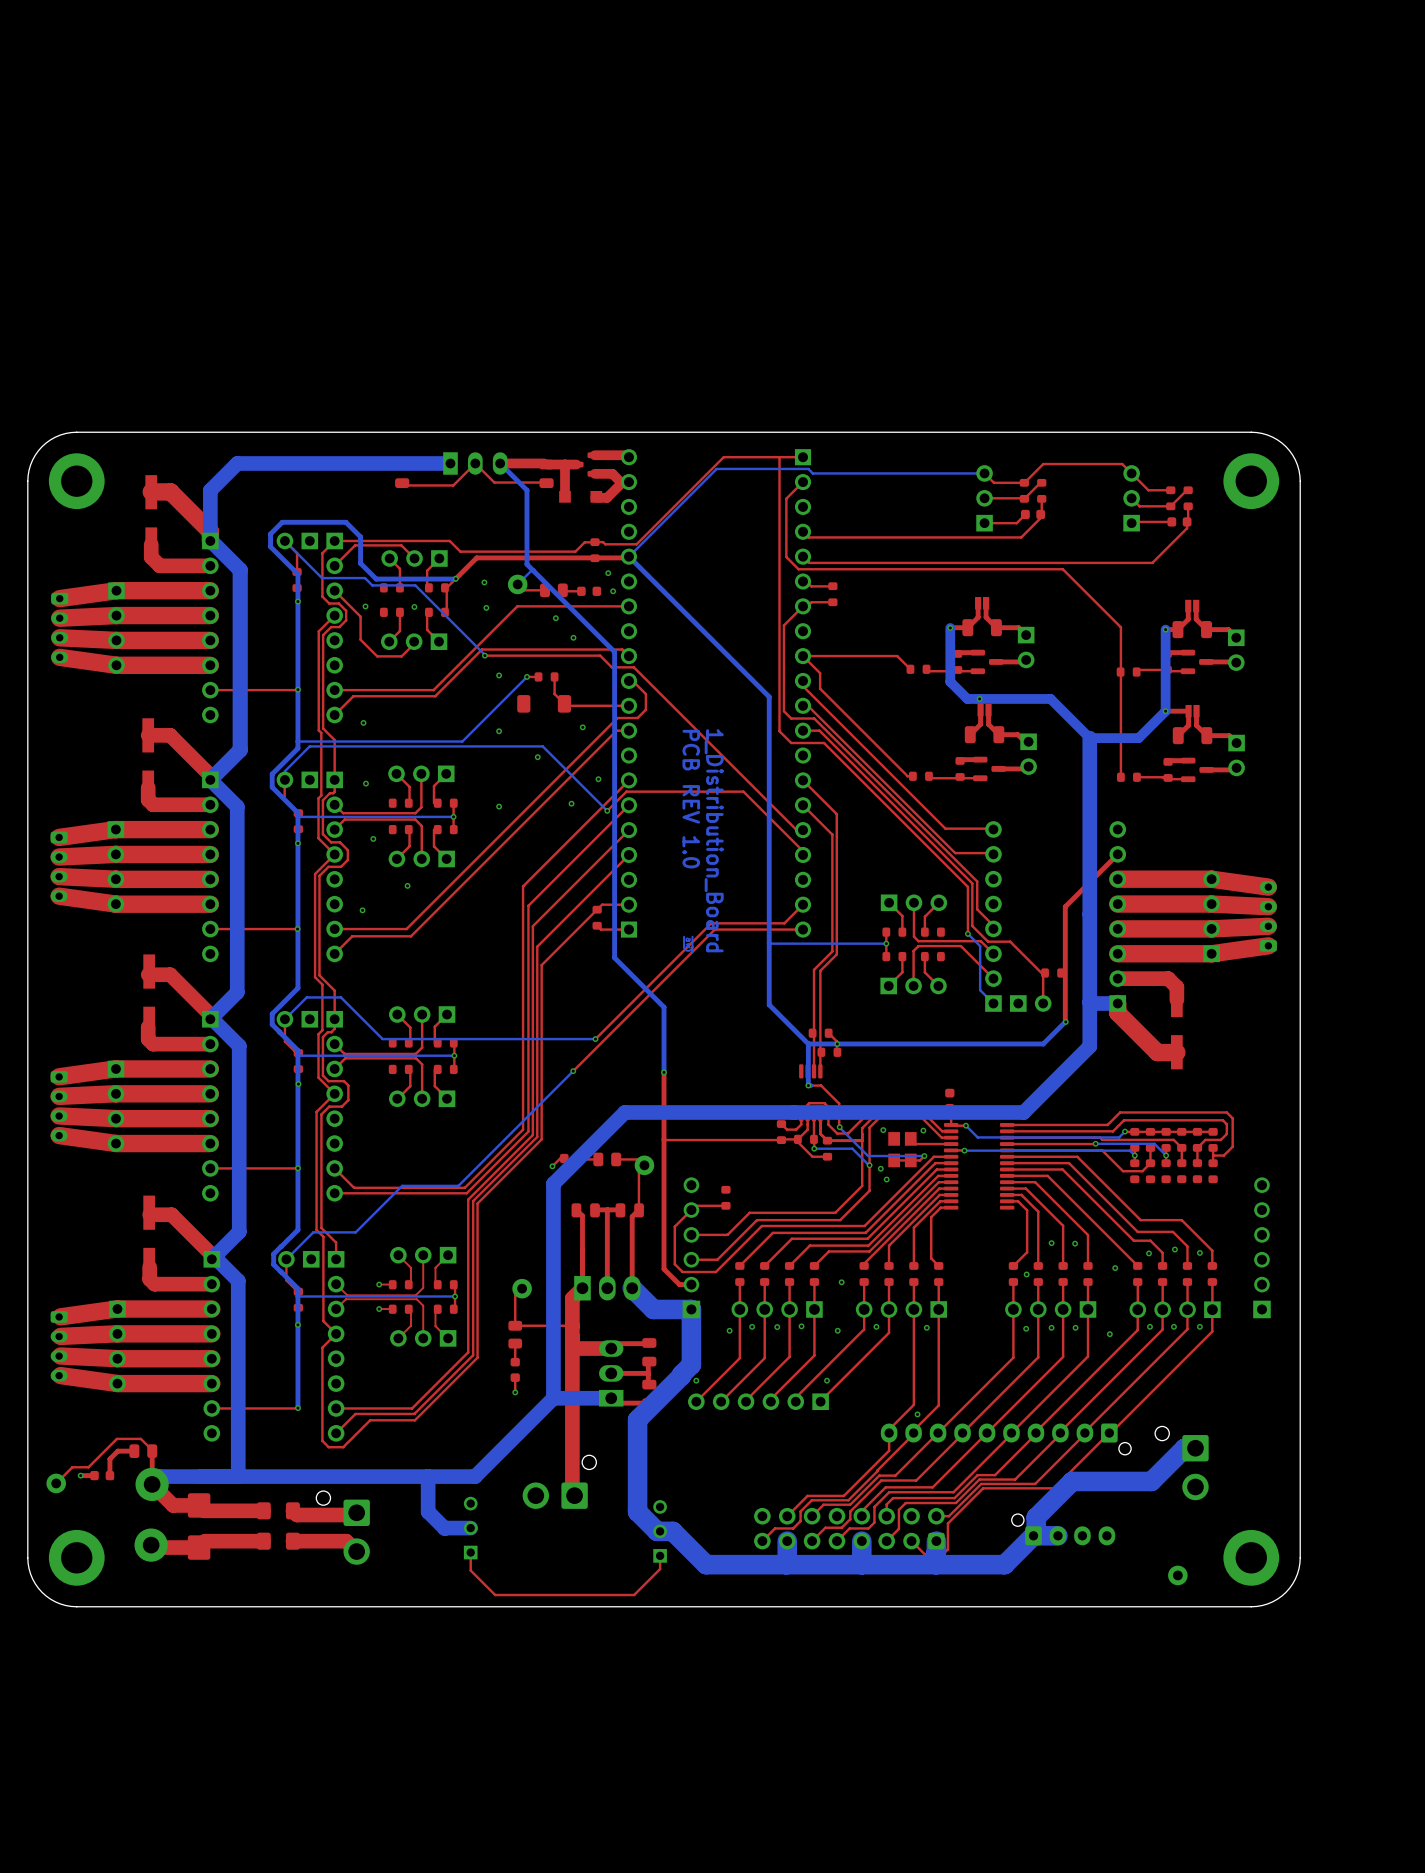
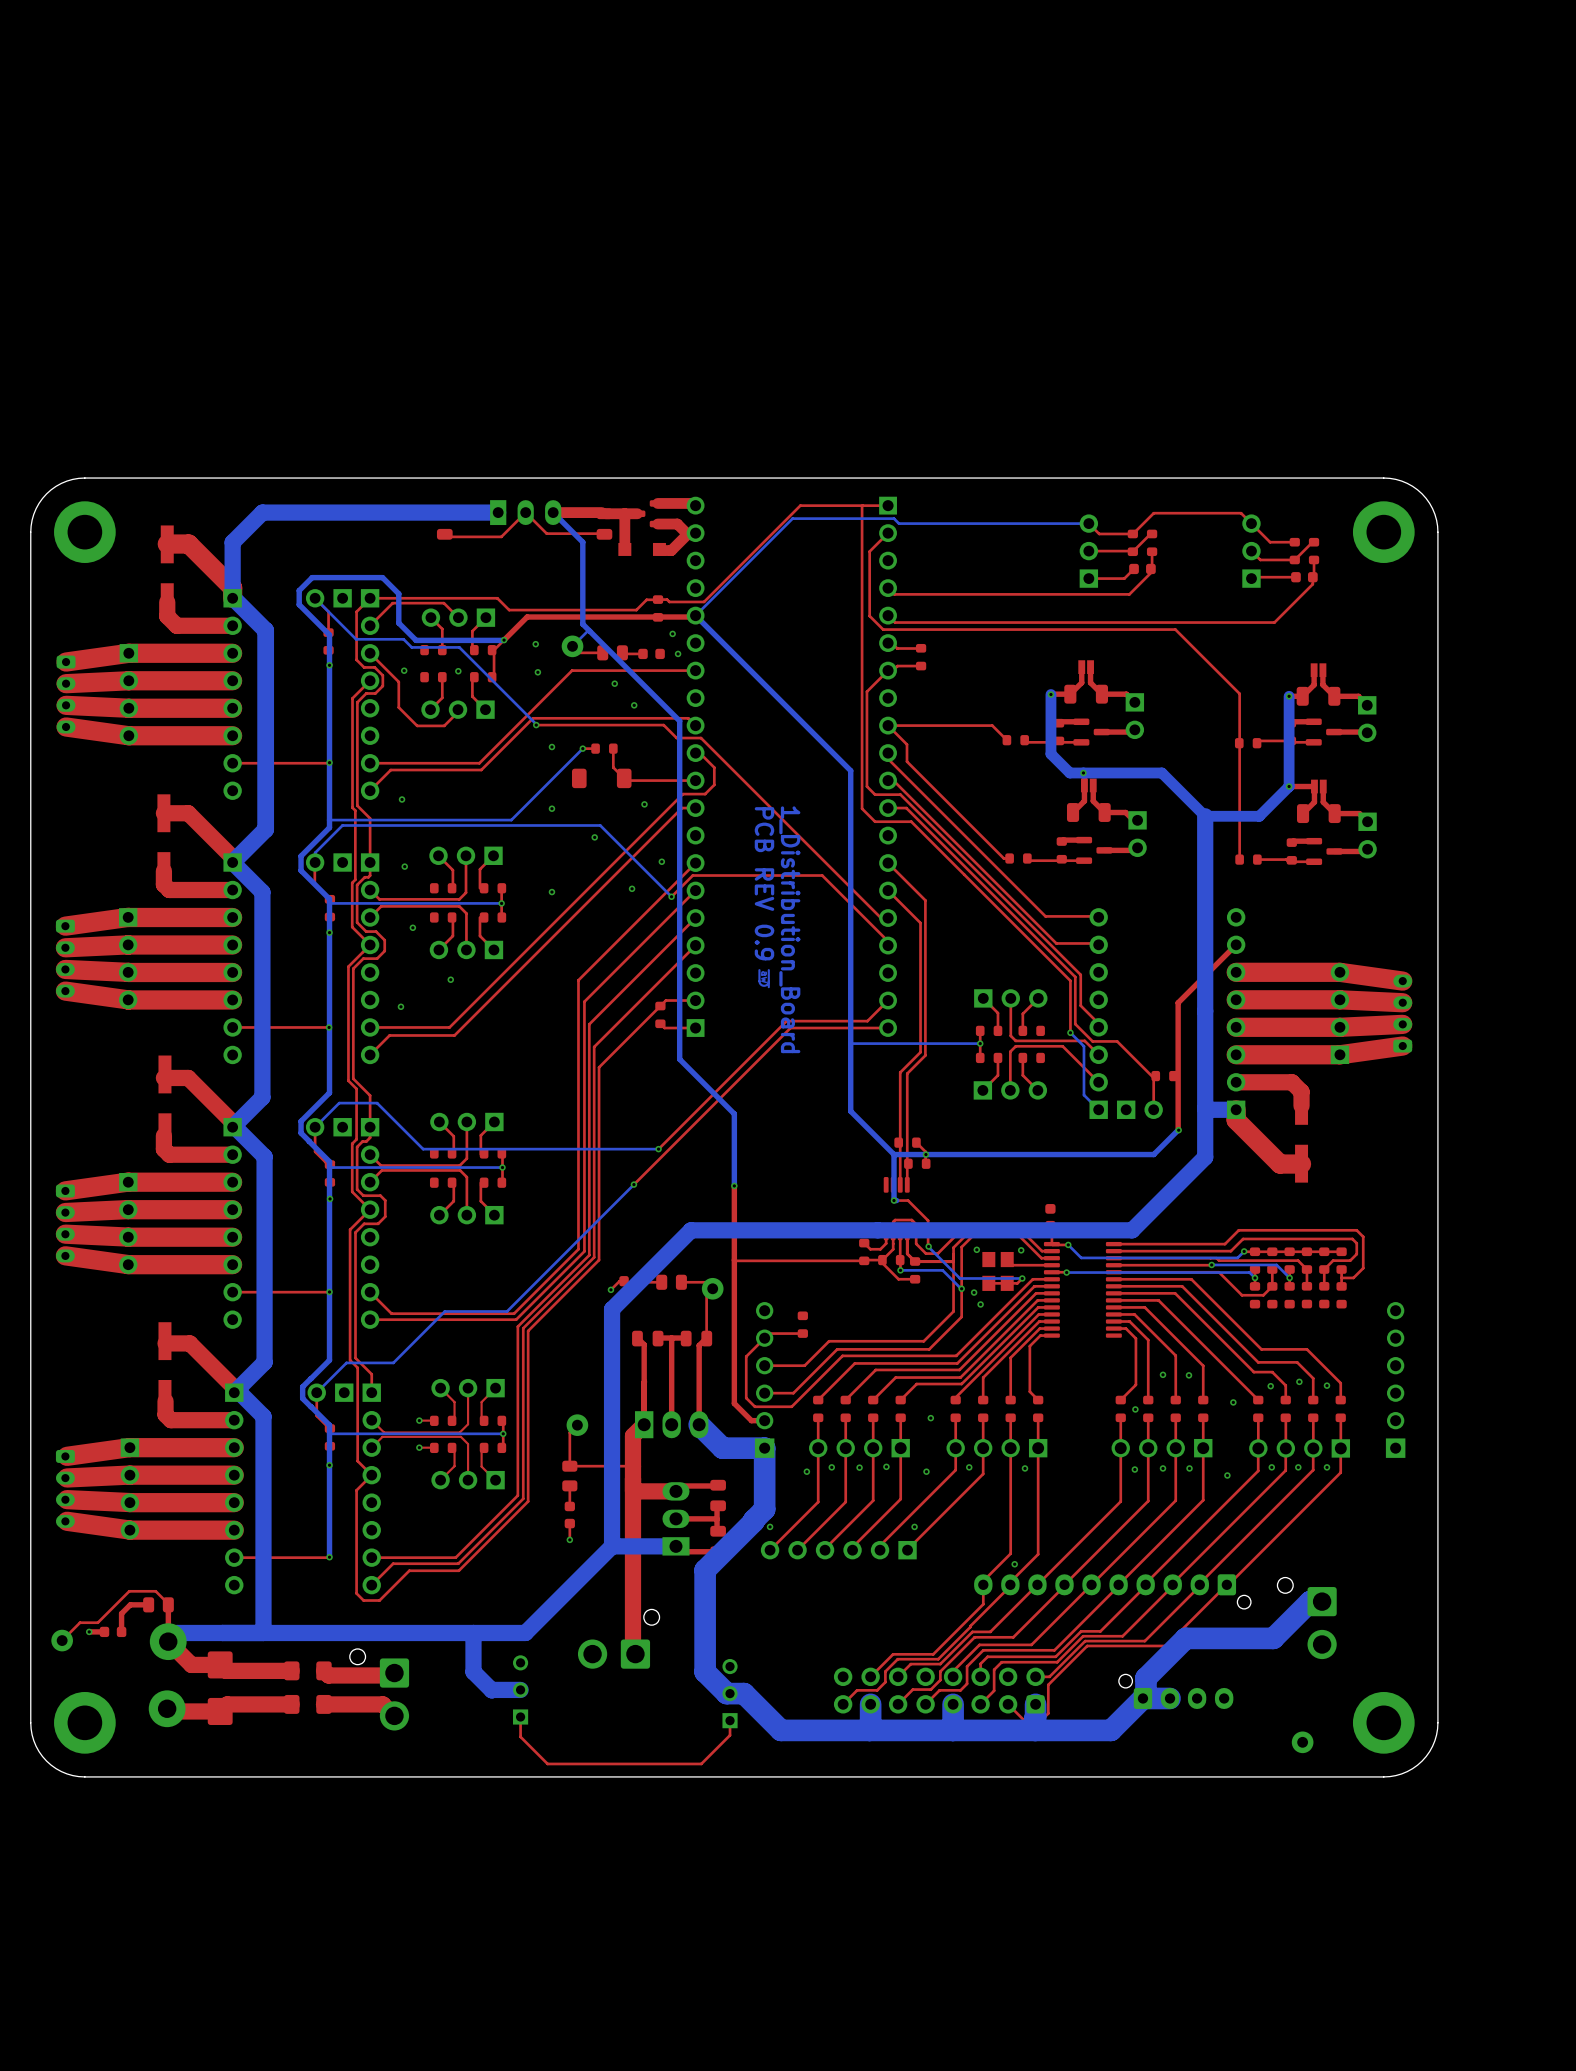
text: PCB REV 1.0 (691, 799) -> PCB REV 0.9 (764, 883)
drawing position: (688, 944) -> (764, 978)

